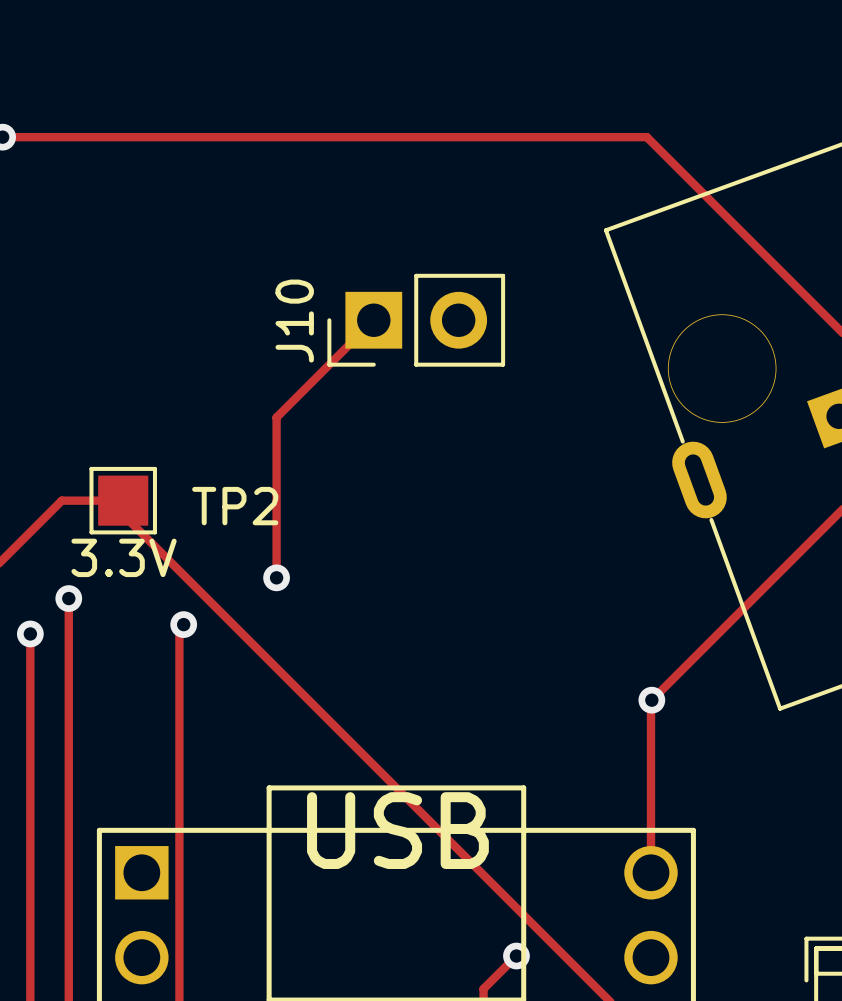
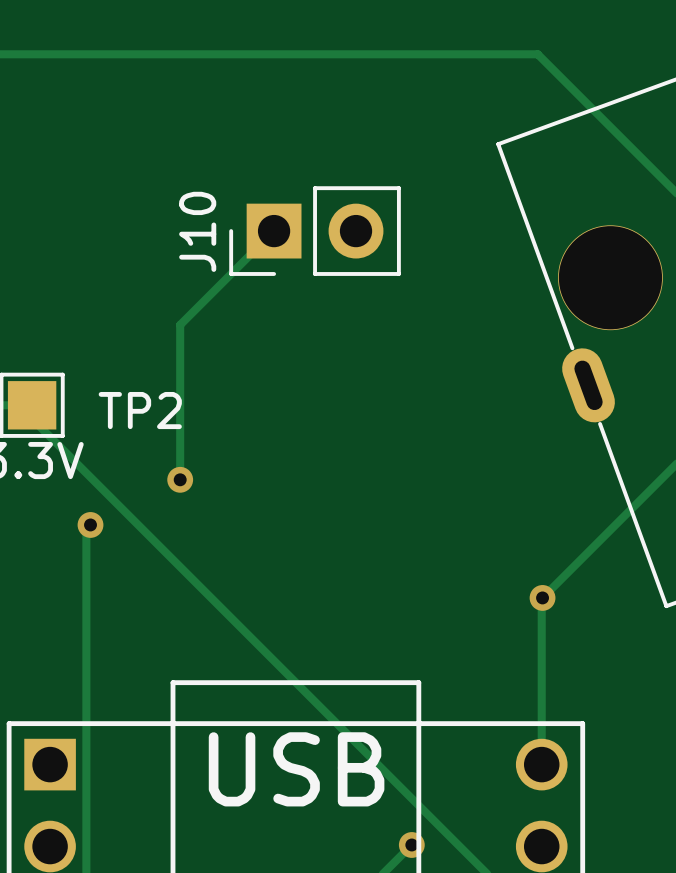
text position: USB (397, 830) -> USB (296, 769)

